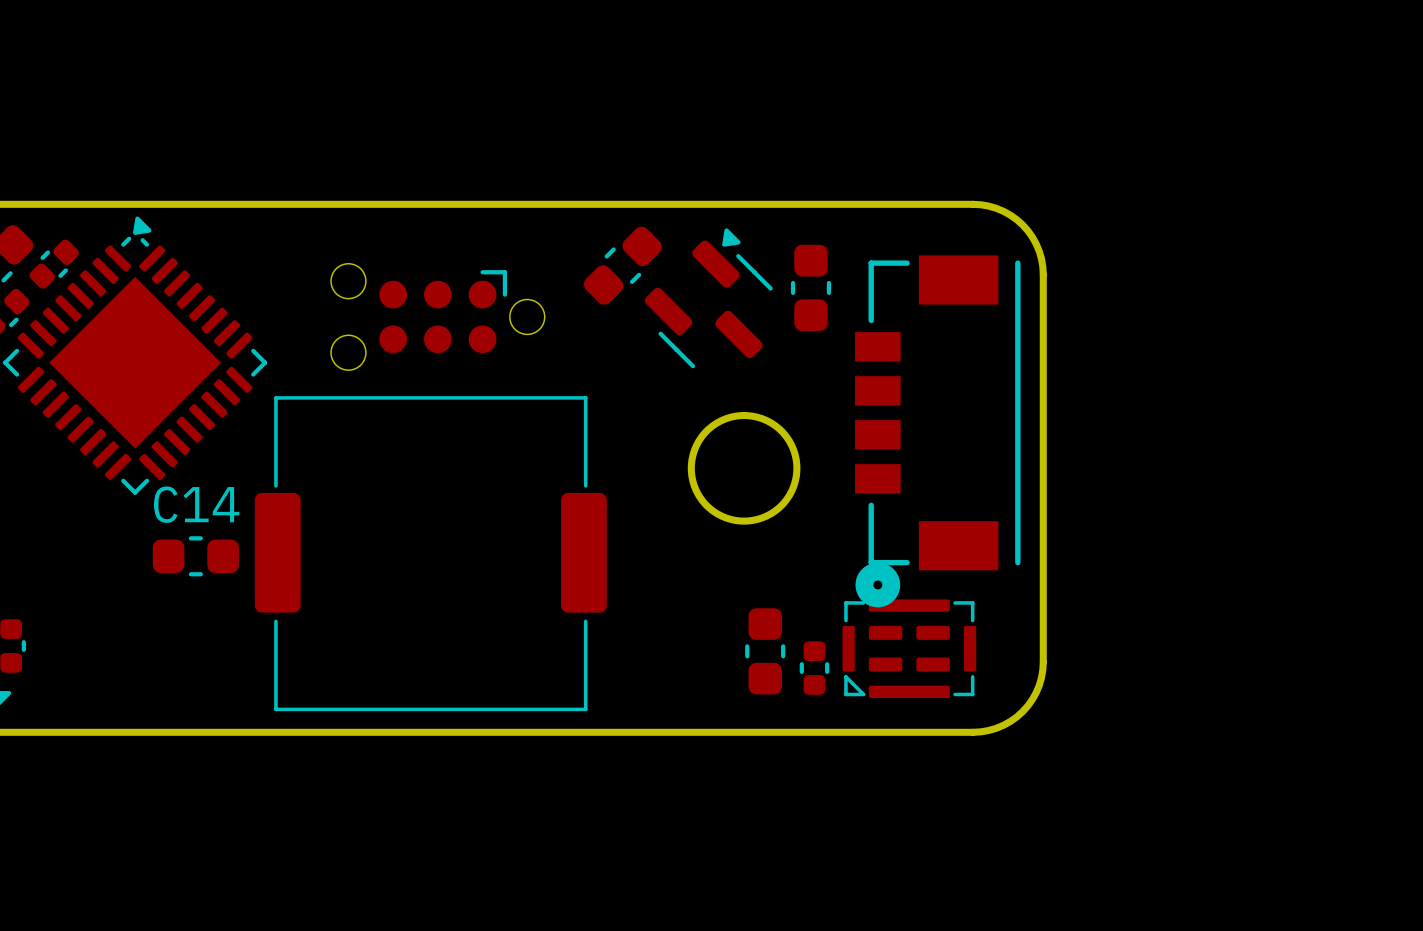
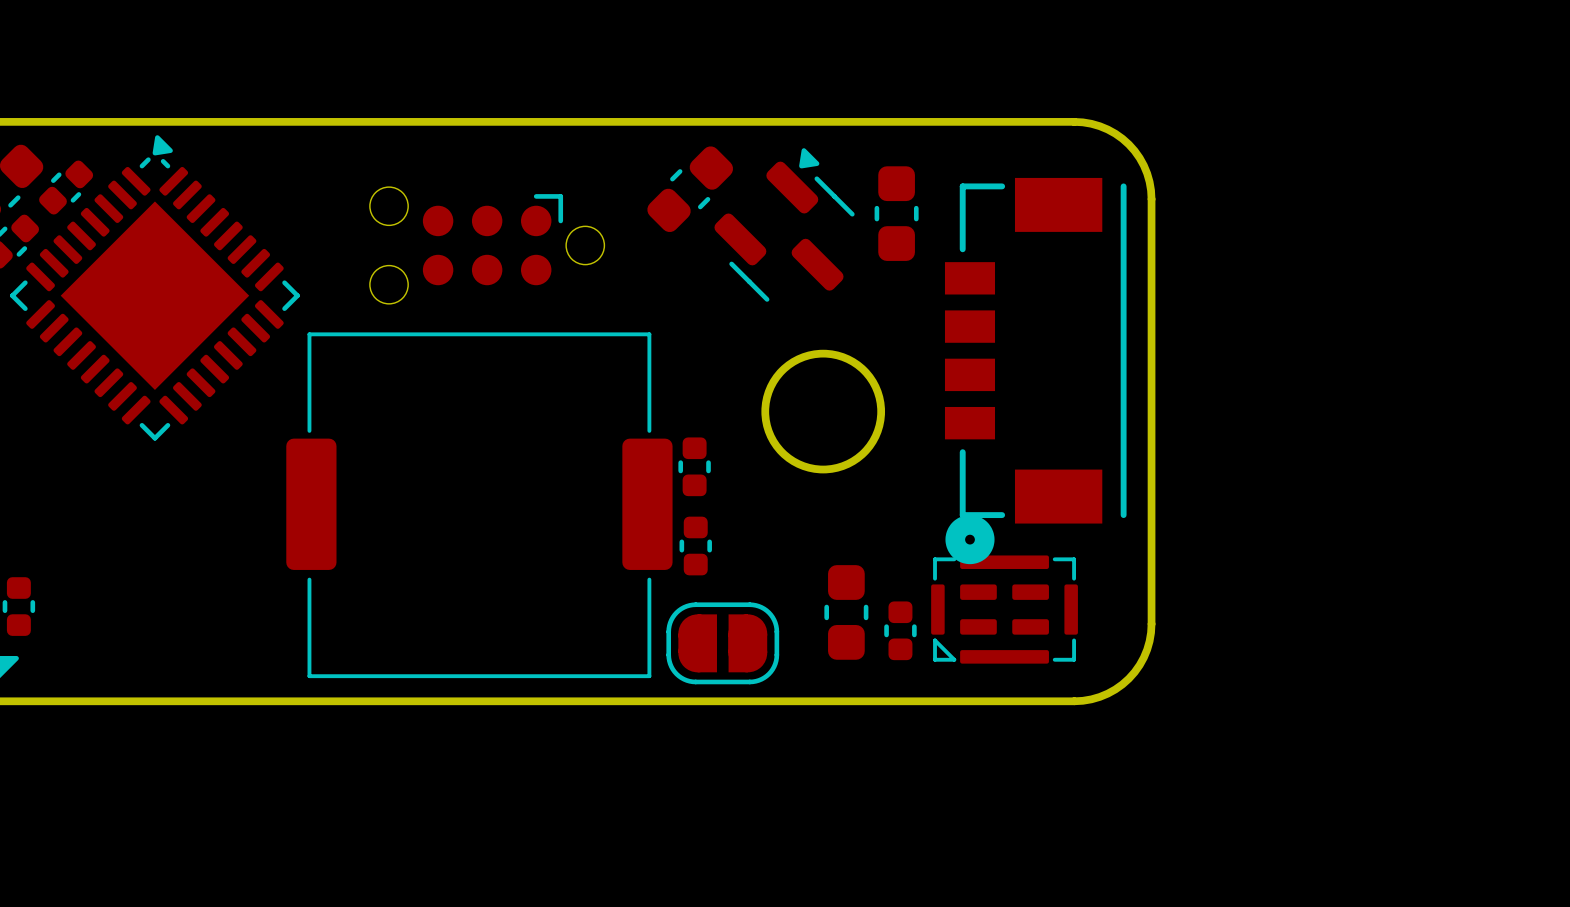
part: none -> (694, 466)
C14: (195, 556) -> none
part: none -> (695, 546)
part: none -> (722, 643)

